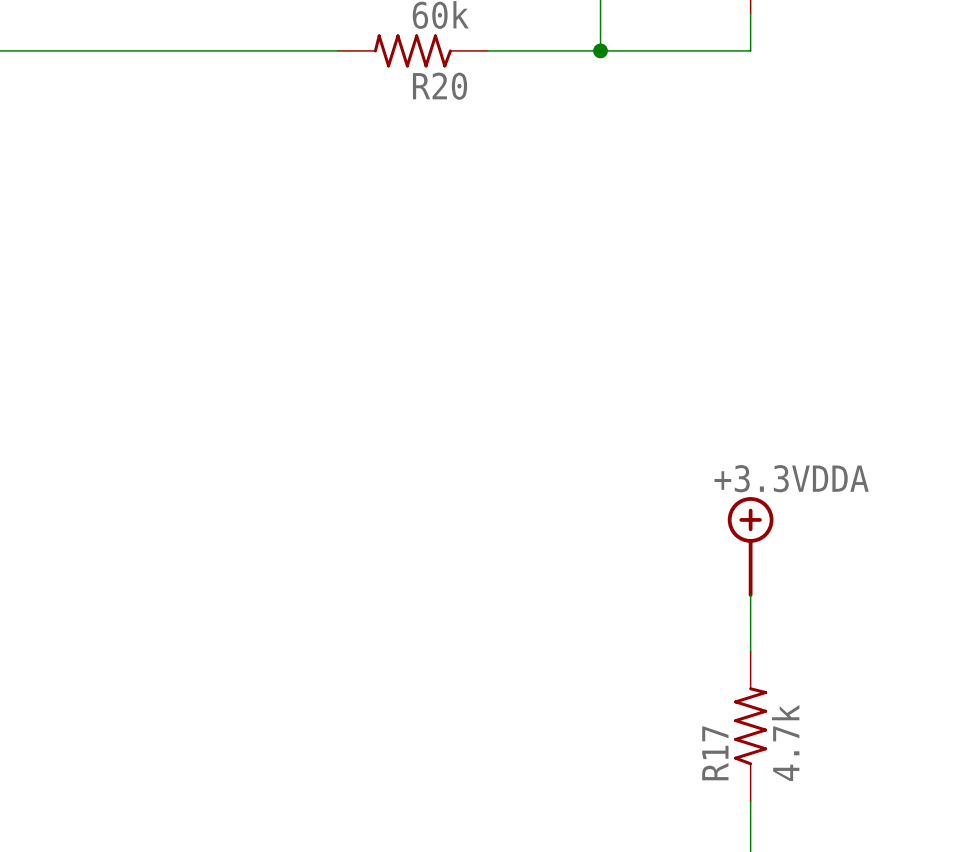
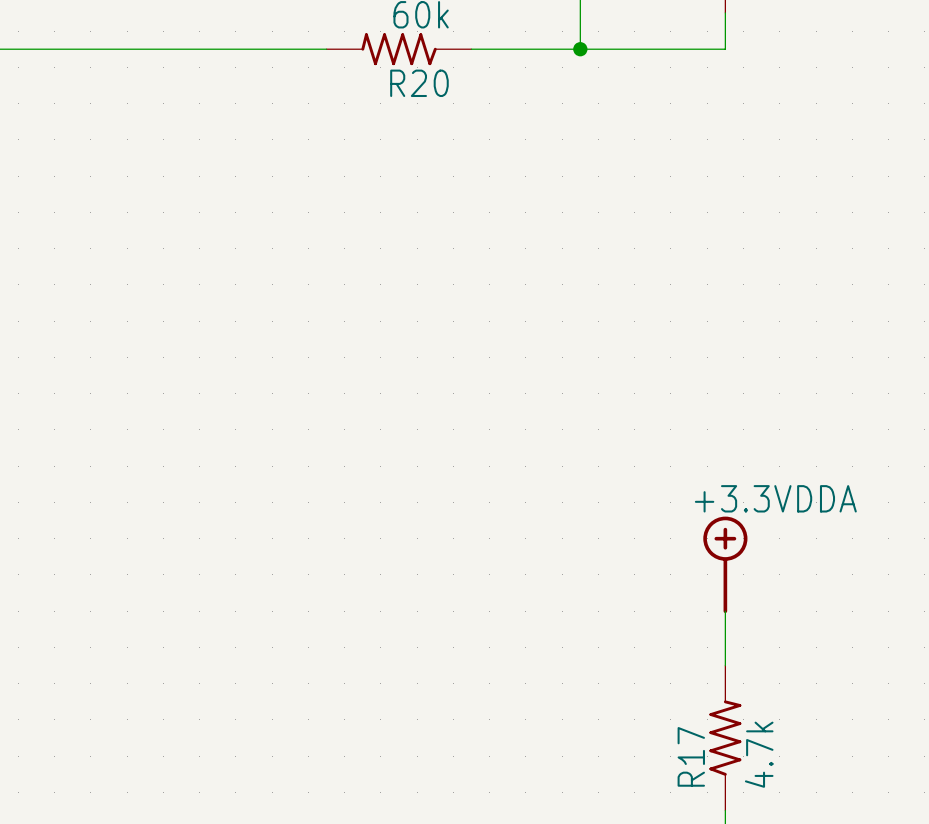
power symbol position: +3.3VDDA (750, 546) -> +3.3VDDA (725, 564)
R17 position: (750, 726) -> (725, 738)

